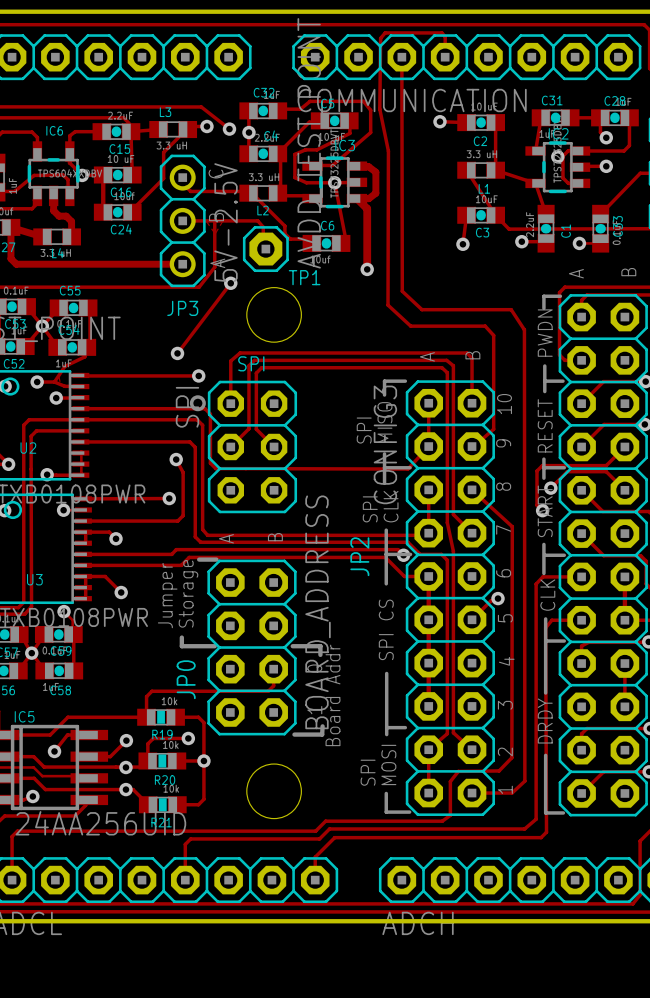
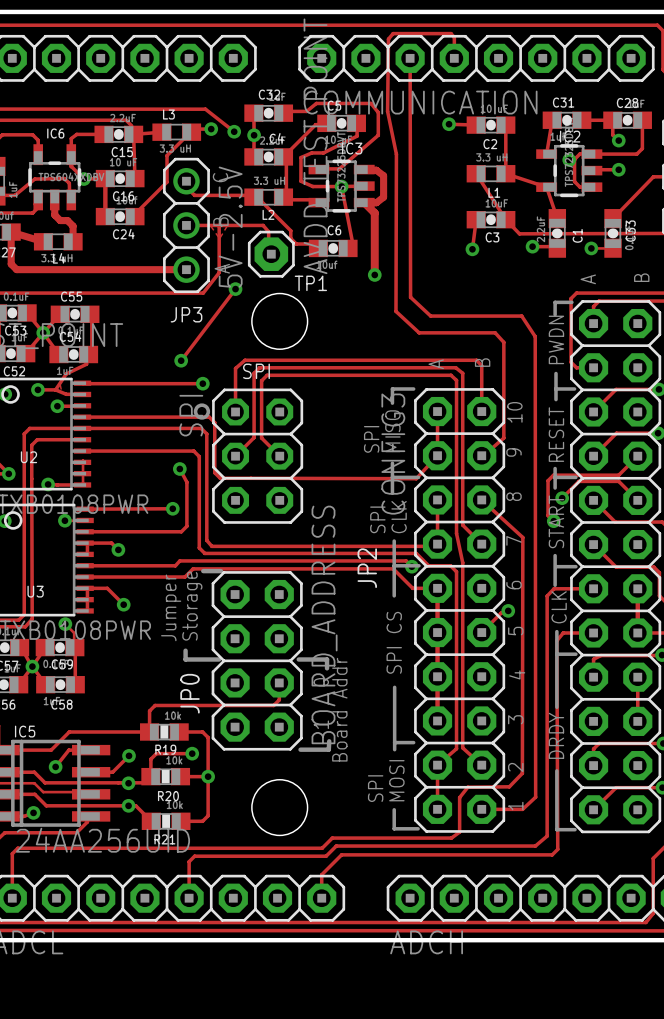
text: B (275, 537) -> none
text: A (226, 538) -> none

